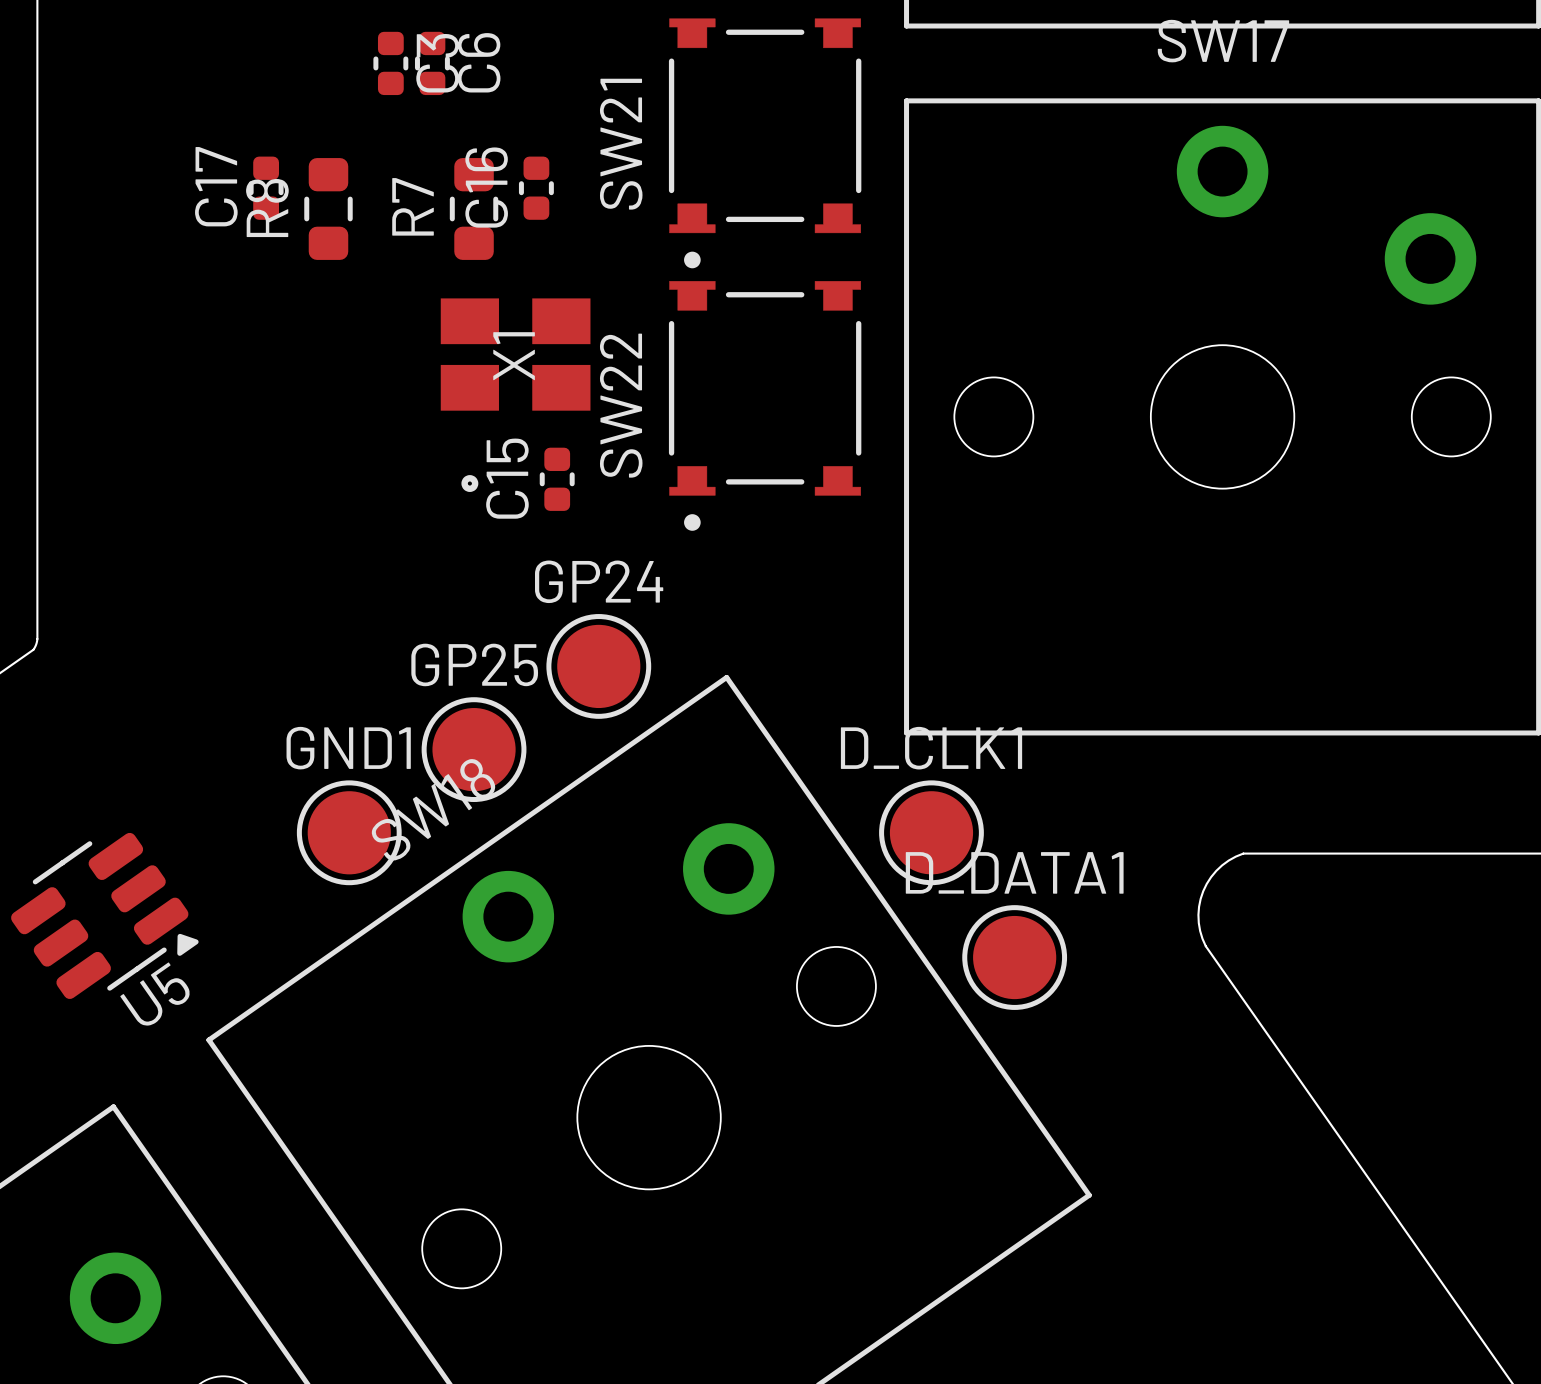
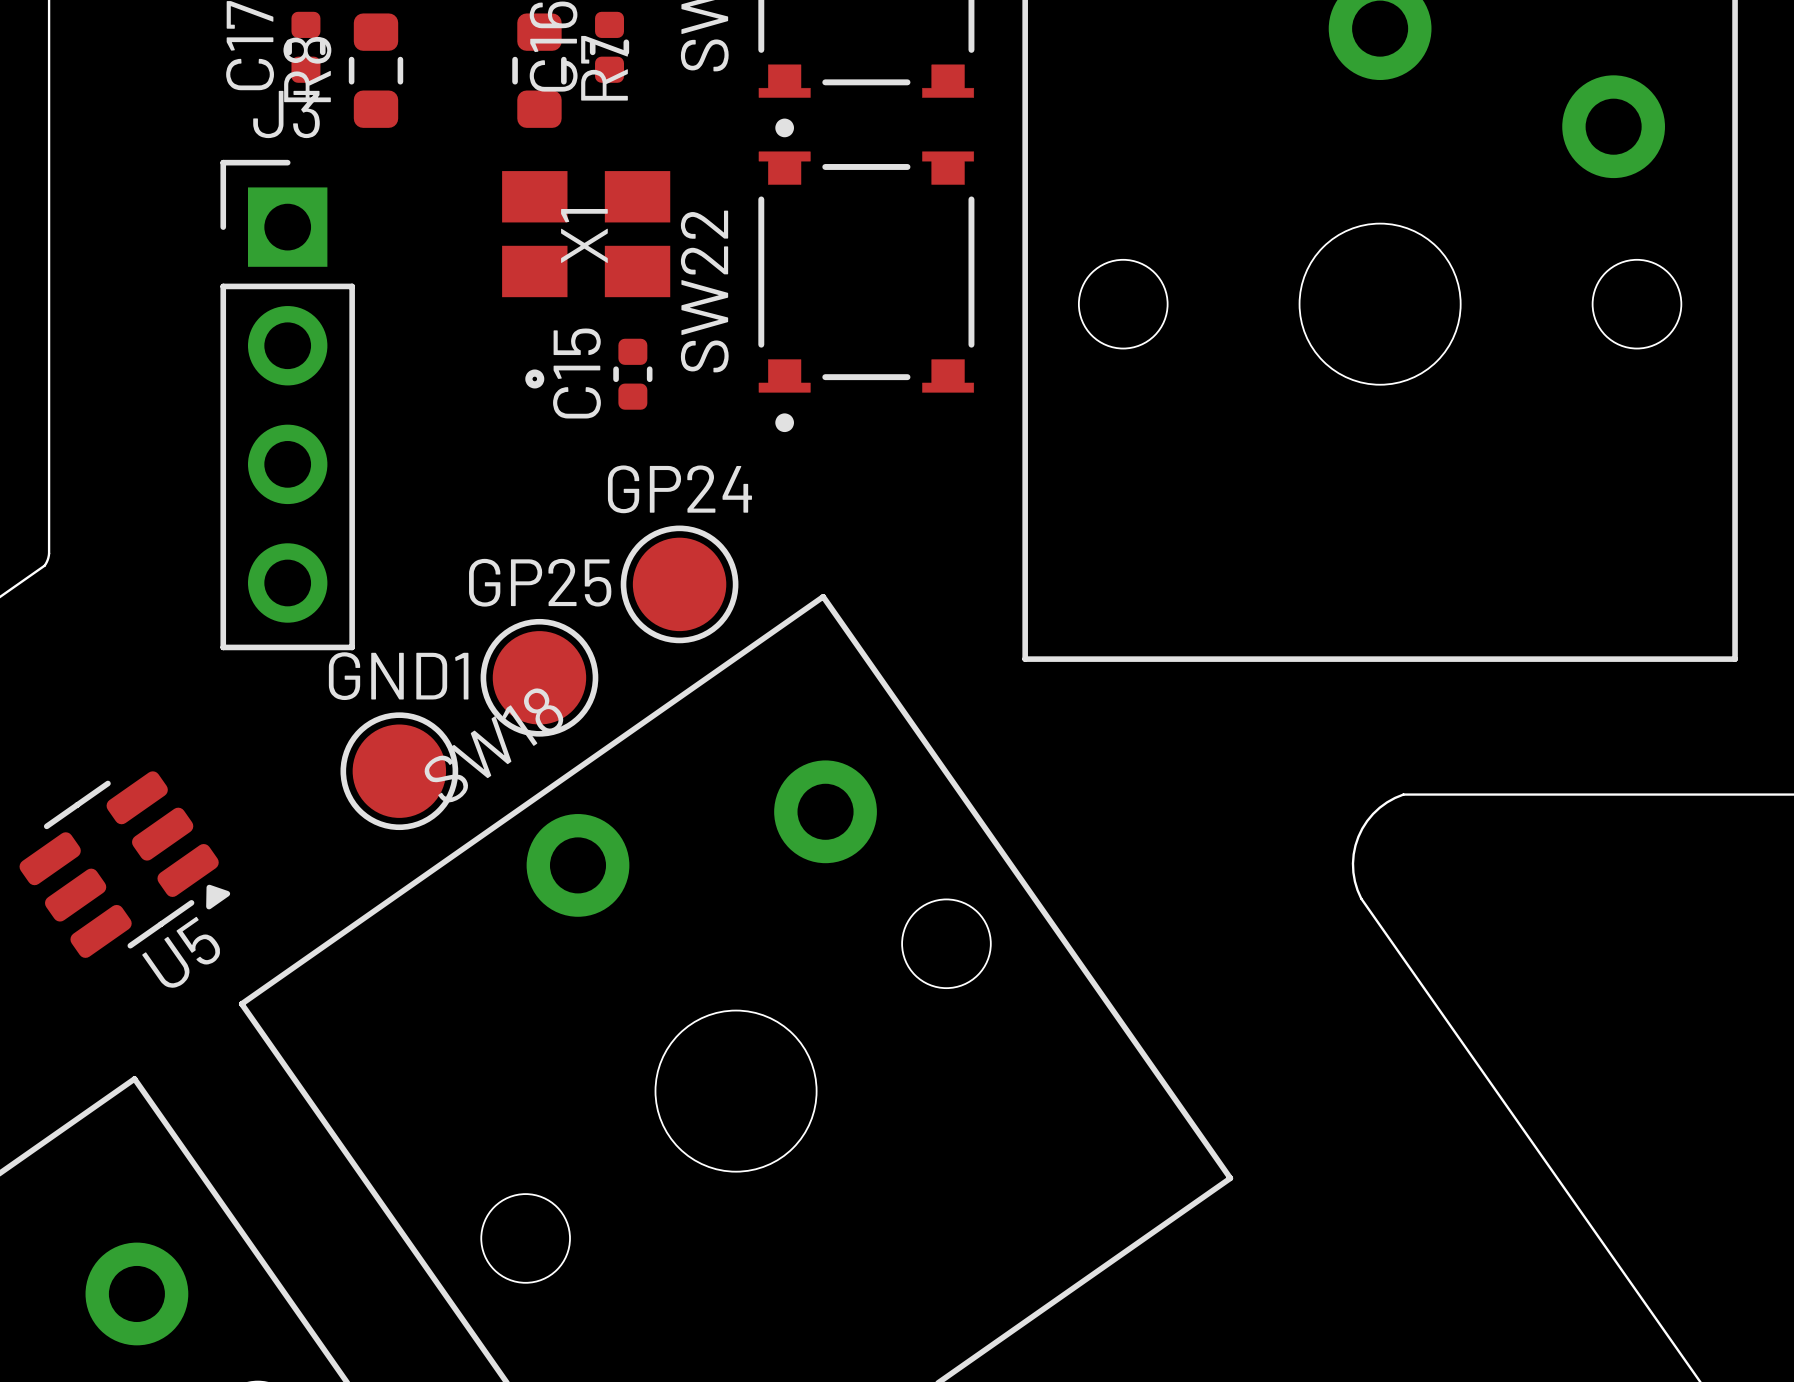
R7 name position: R7 (413, 206) -> R7 (604, 68)
J3: none -> (287, 405)
D_CLK1: (931, 832) -> none
D_DATA1: (1014, 957) -> none

